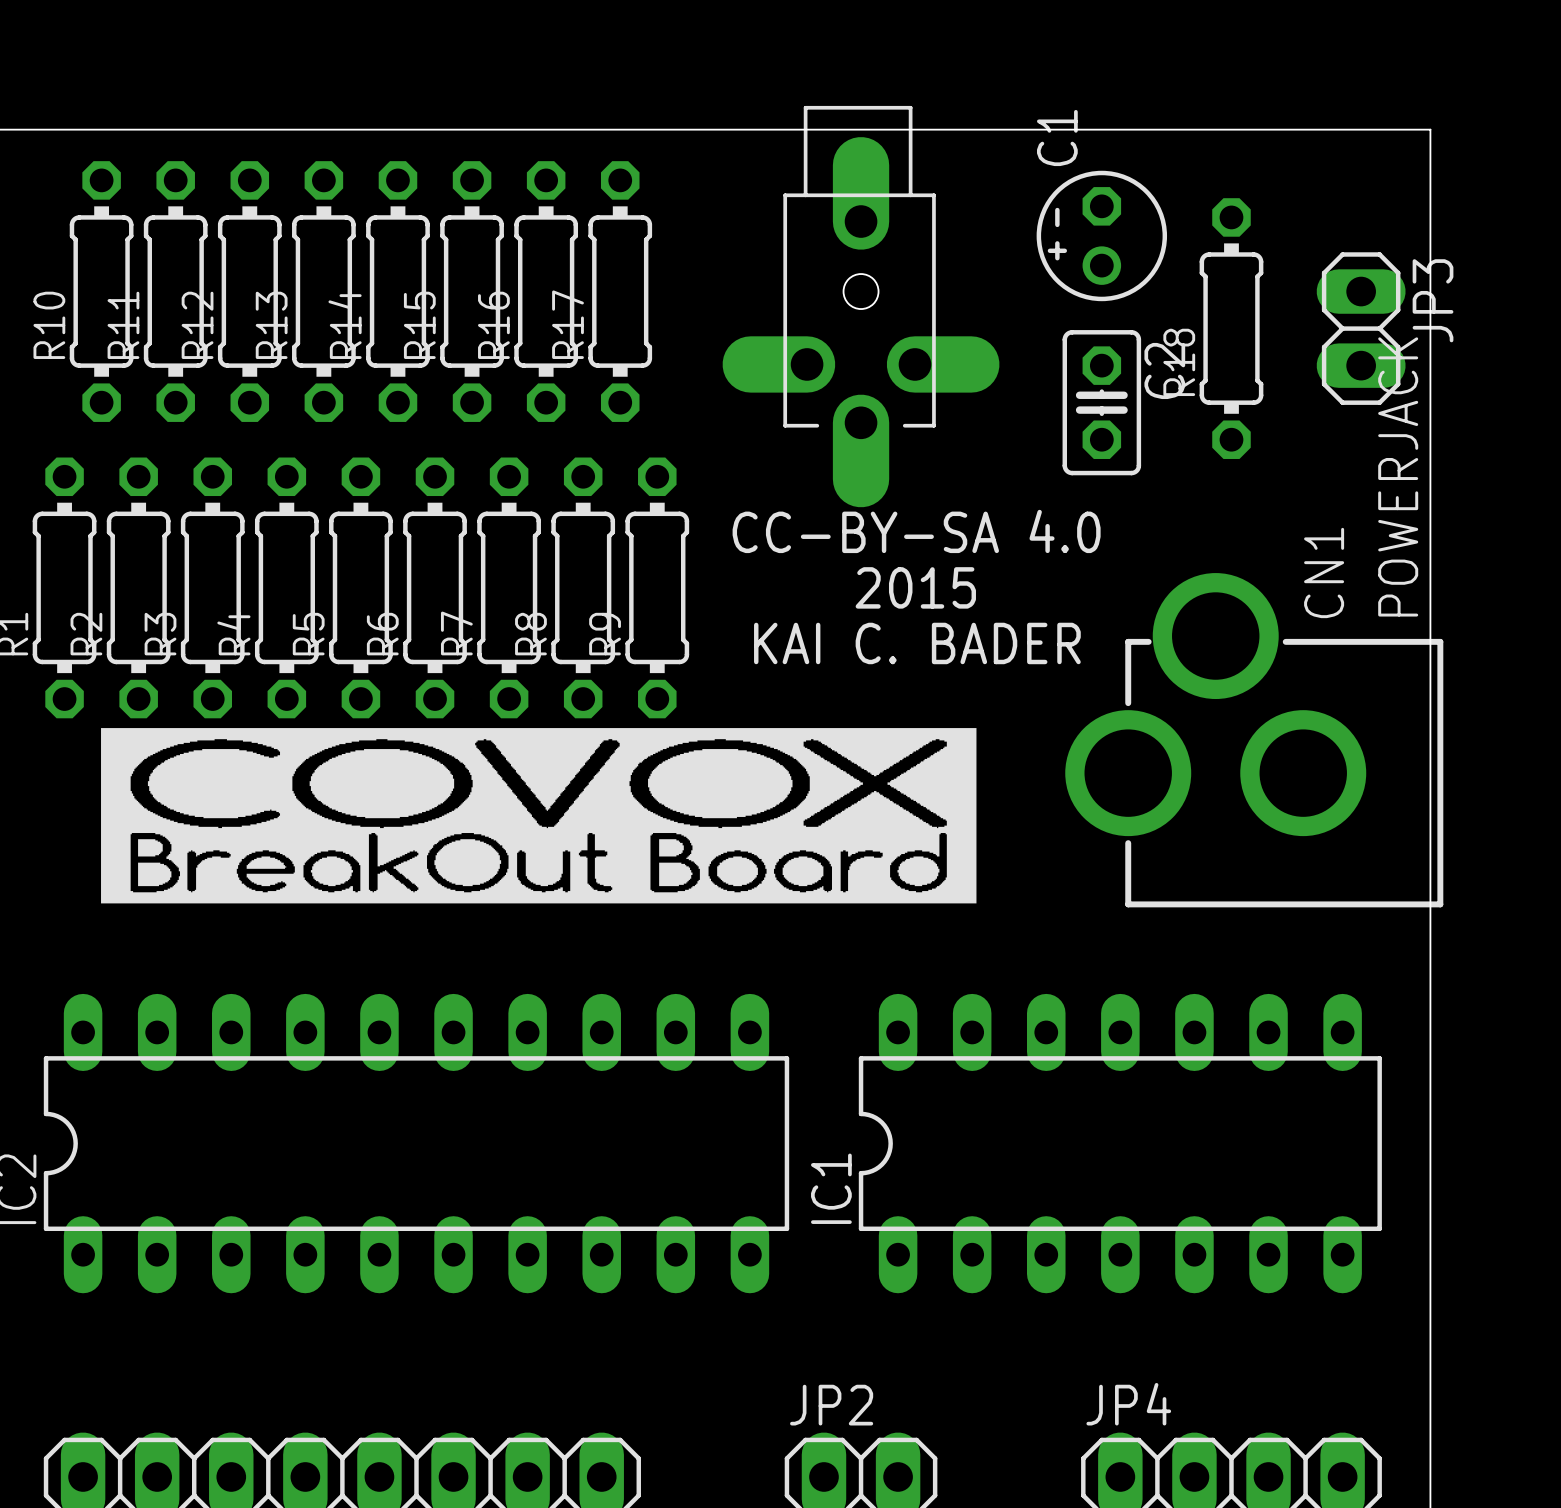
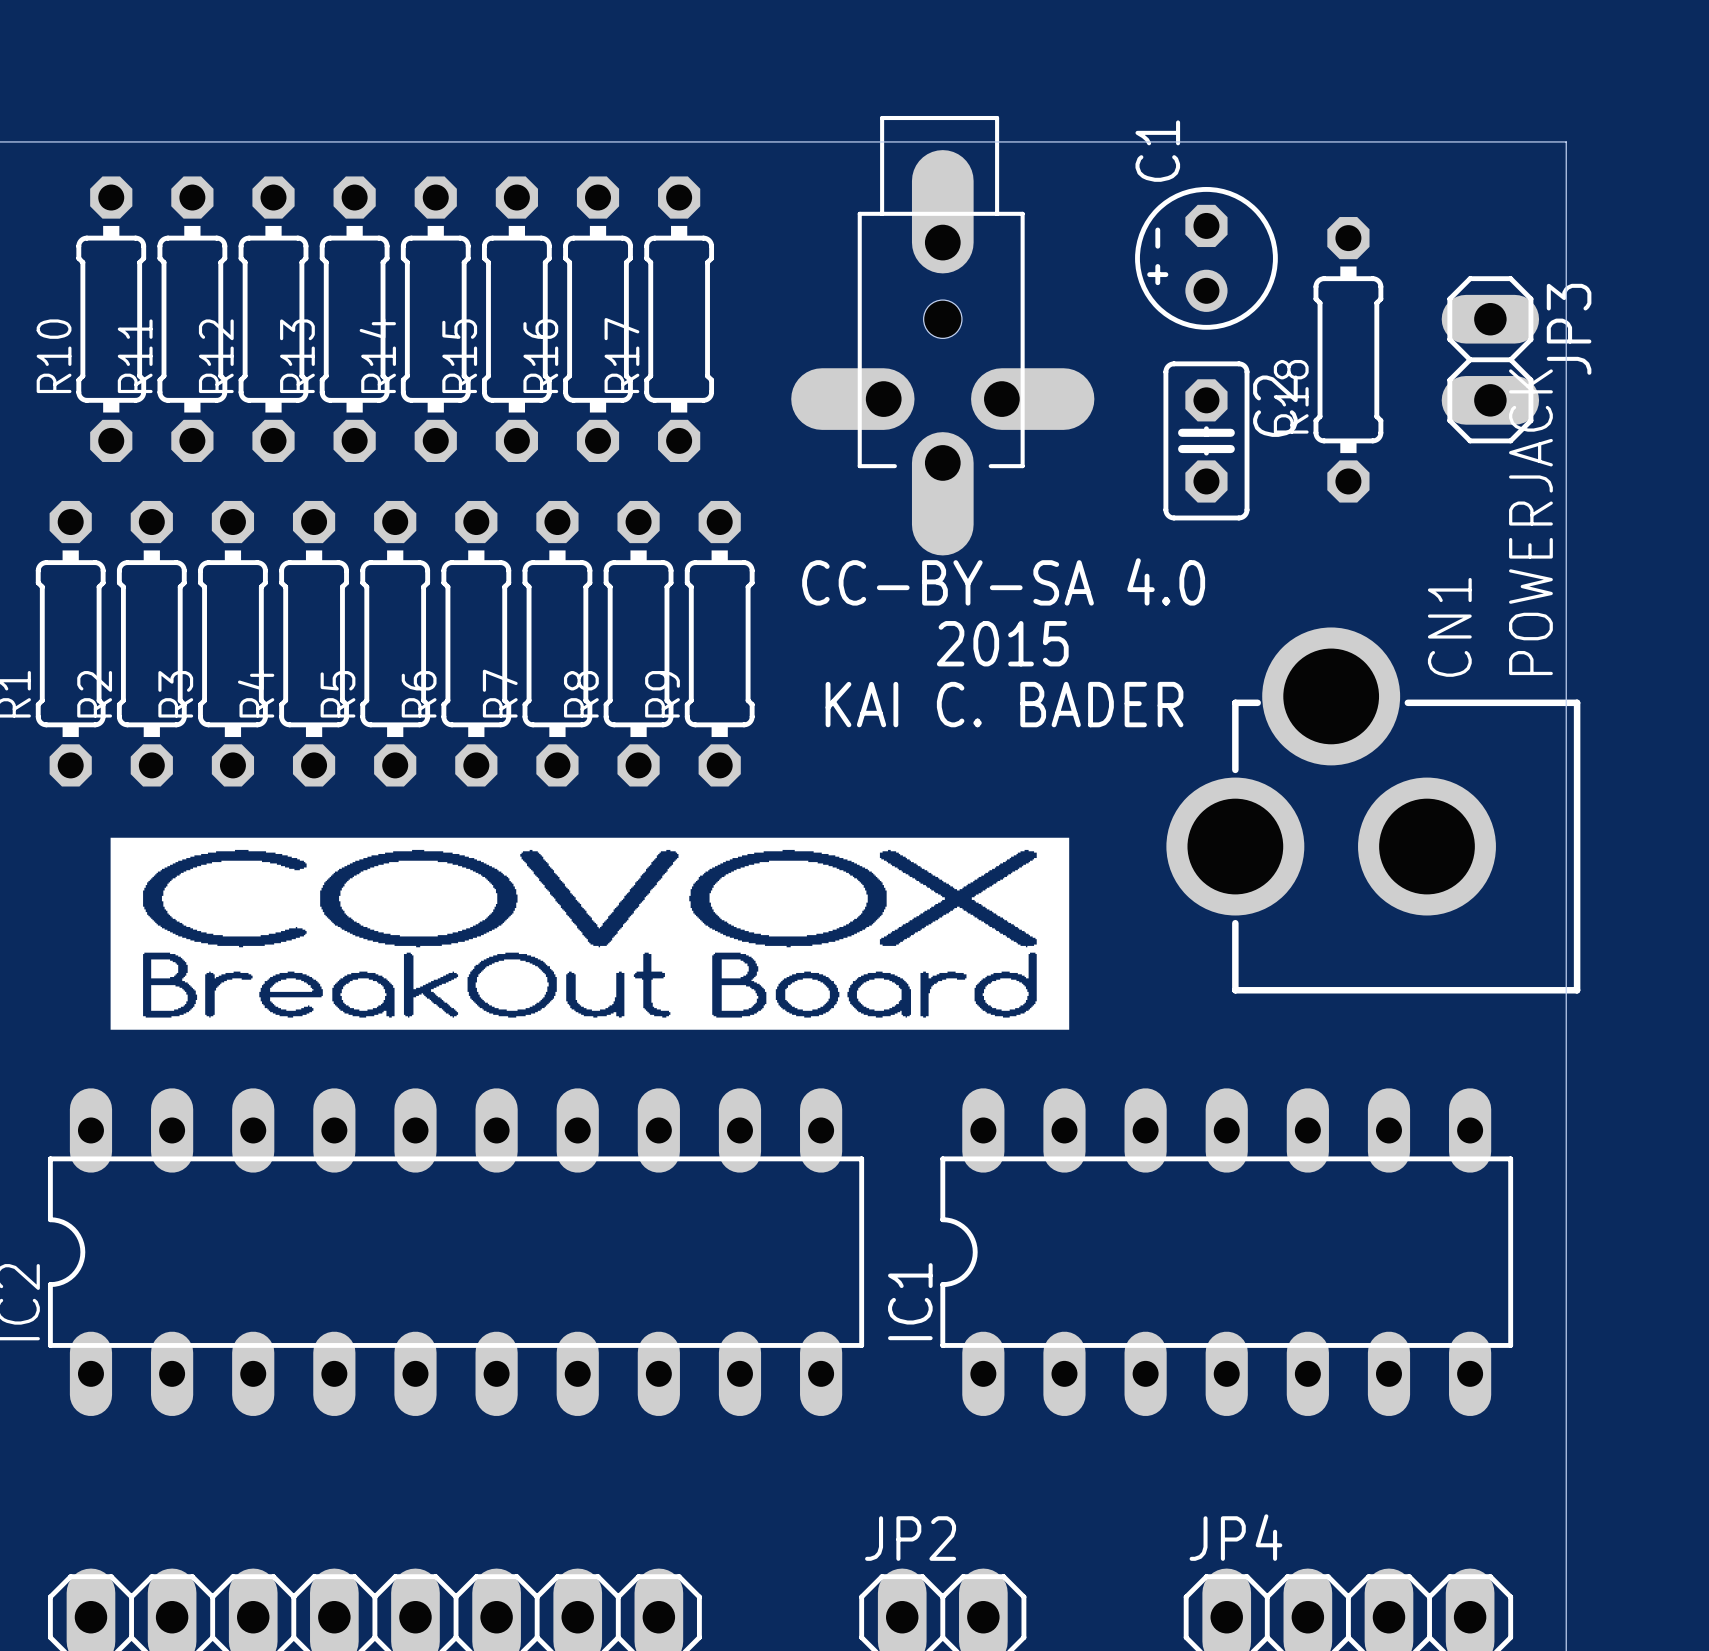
drawing position: (538, 815) -> (589, 933)

